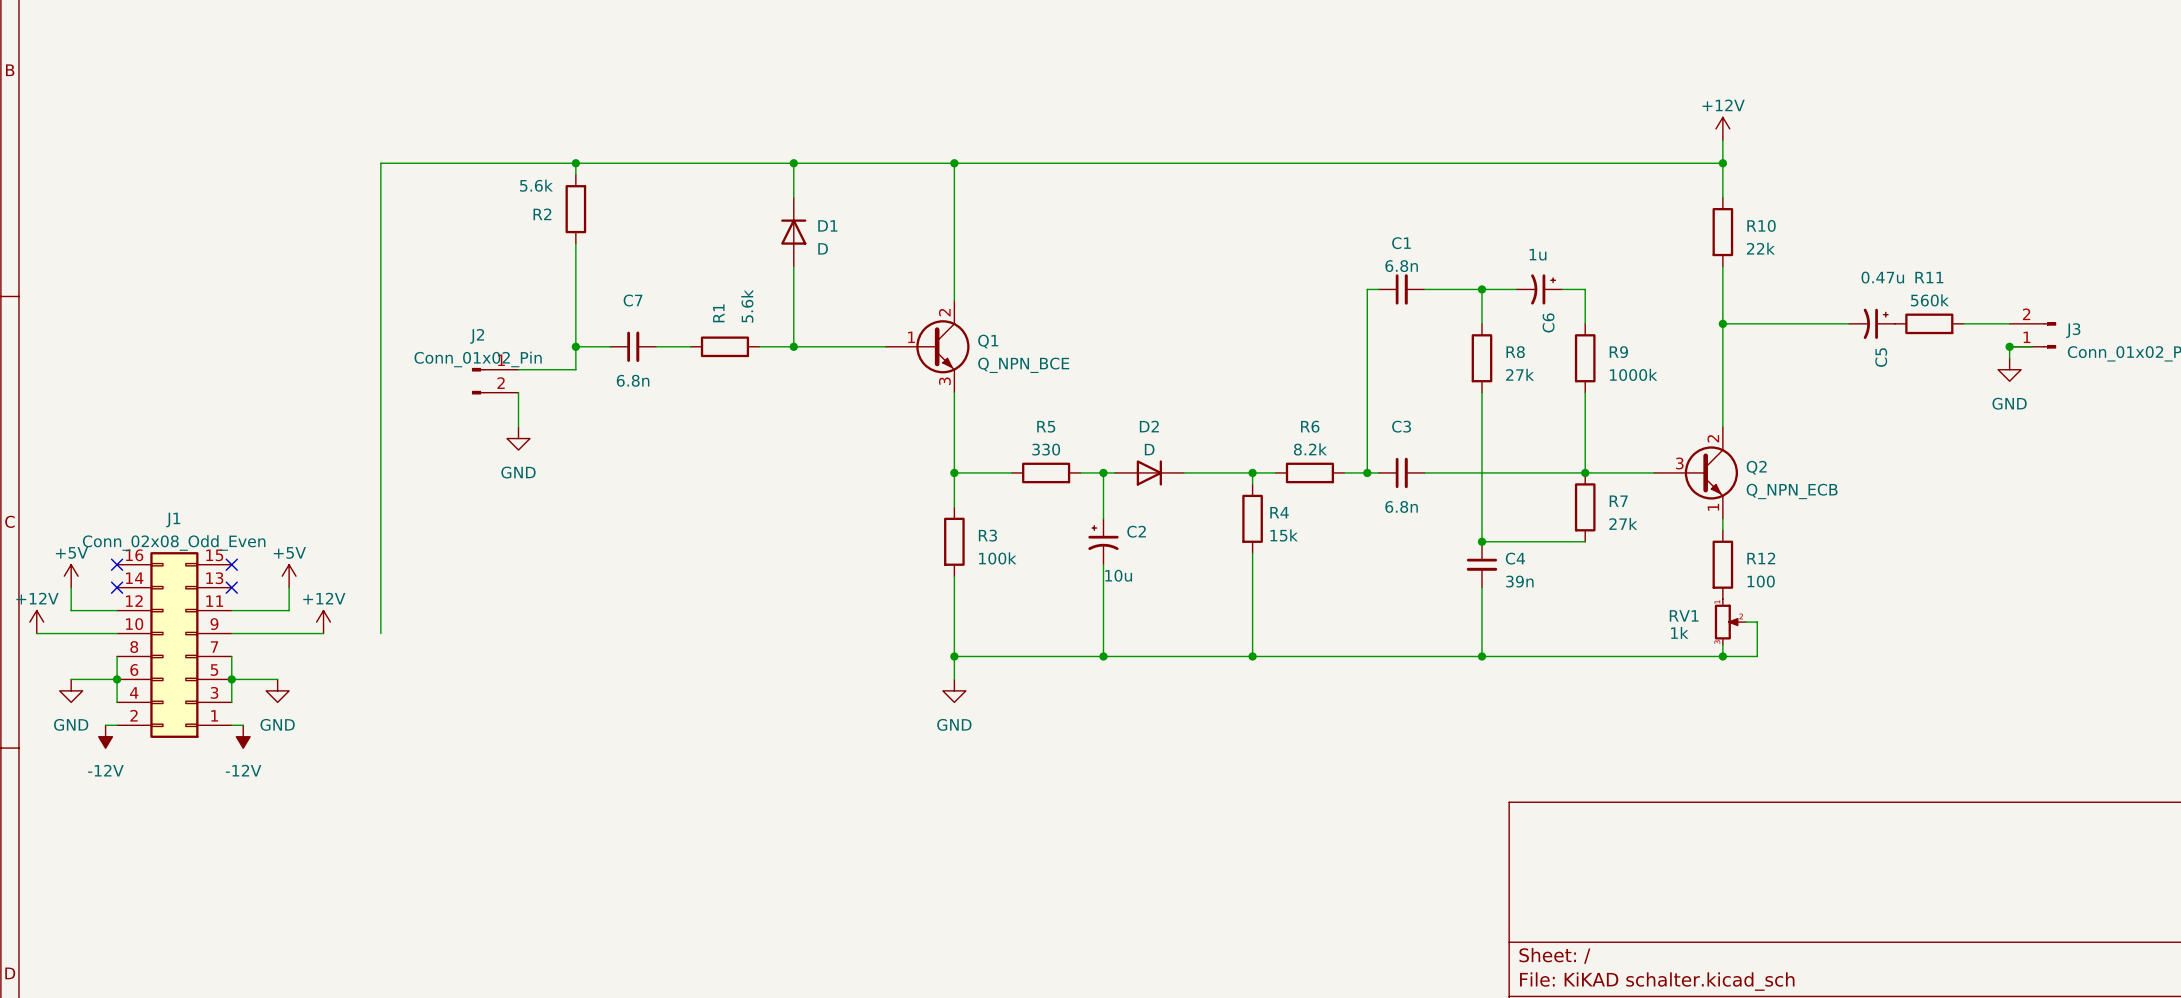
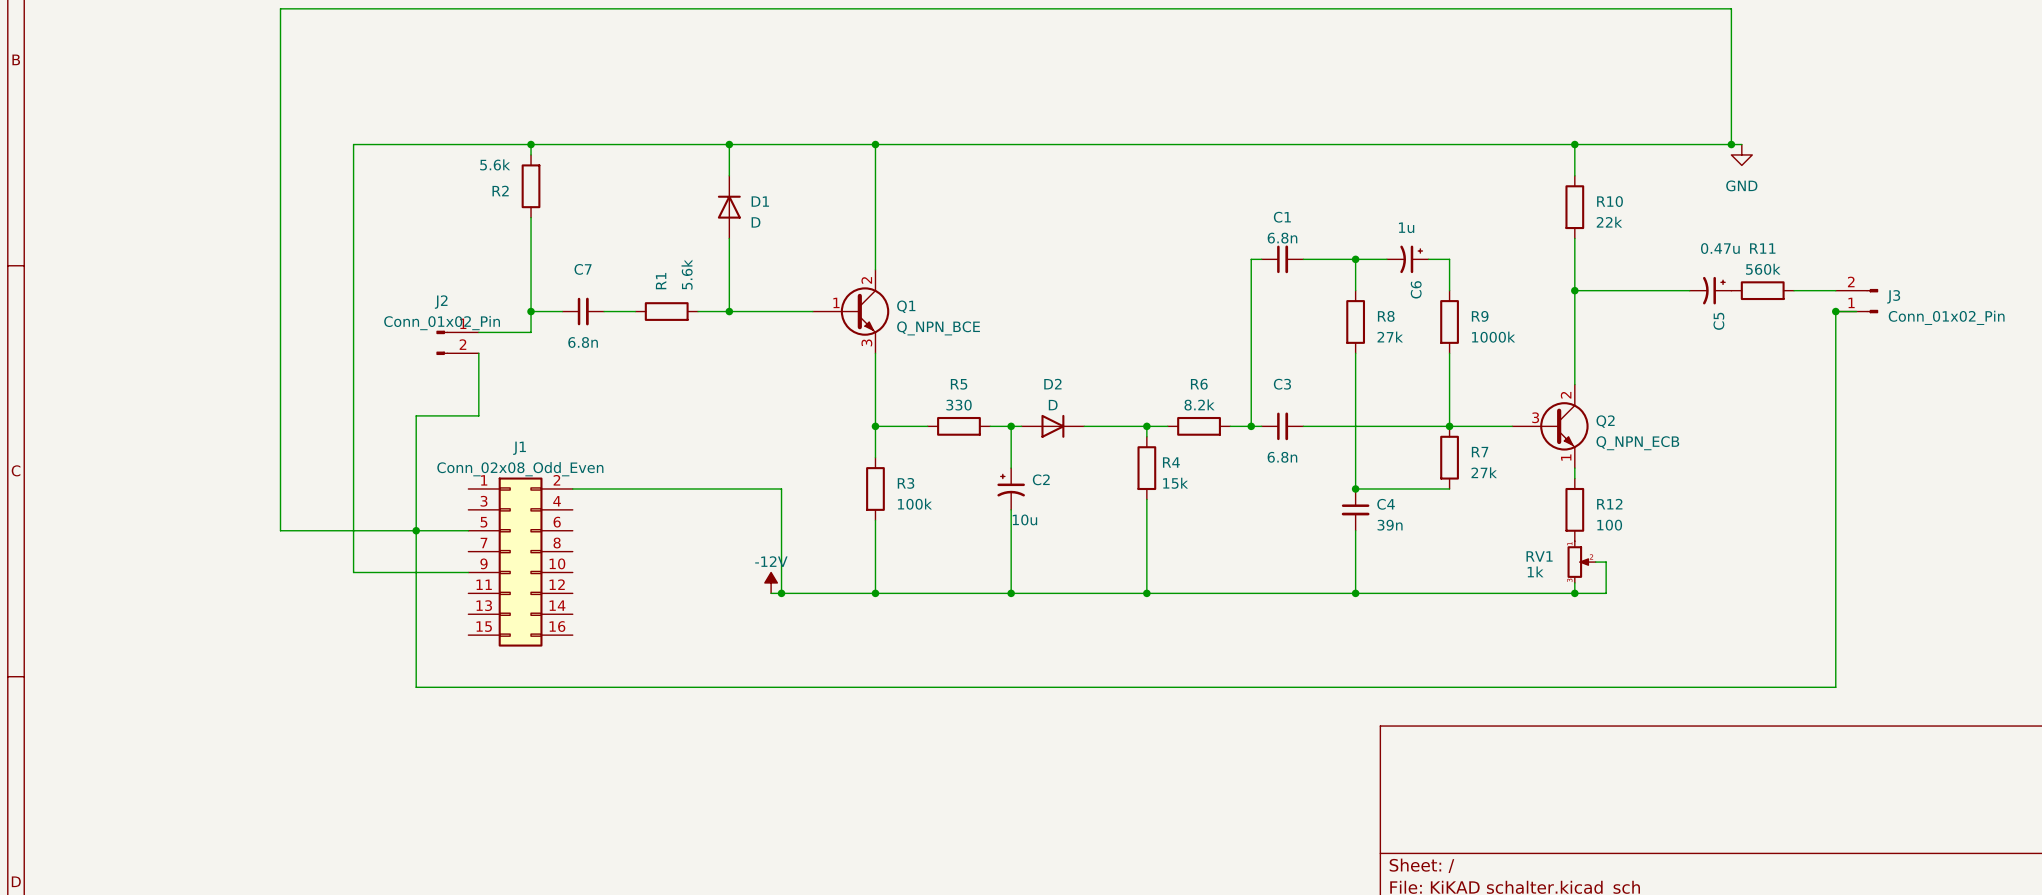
power symbol: +12V (1722, 128) -> none
wire: (1722, 140) (1722, 163) -> (1741, 144) (1574, 144)
wire: none -> (1731, 144) (1731, 8) (280, 8) (280, 530) (468, 530)
junction: none -> (1731, 144)
wire: none -> (1835, 321) (1835, 687) (416, 687) (416, 415) (478, 415) (478, 384)
power symbol position: GND (2009, 369) -> GND (1741, 154)
power symbol: GND (518, 438) -> none
wire: none -> (572, 488) (781, 488) (781, 593)
no-connect mark: (117, 564) -> none
no-connect mark: (231, 564) -> none
power symbol: +5V (71, 576) -> none
power symbol: +5V (289, 576) -> none
wire: (71, 587) (71, 610) (117, 610) -> none
no-connect mark: (117, 587) -> none
no-connect mark: (231, 587) -> none
wire: (289, 587) (289, 610) (231, 610) -> none
junction: none -> (416, 530)
power symbol: +12V (36, 622) -> none
power symbol: +12V (323, 622) -> none
wire: (36, 633) (117, 633) -> none
wire: (231, 633) (323, 633) -> none
wire: none -> (353, 572) (468, 572)
J1 rotation: 0° (174, 645) -> 180° (520, 562)
J1 position: (174, 645) -> (520, 562)
power symbol: none -> -12V (771, 582)
wire: (117, 656) (117, 702) -> none
wire: (231, 656) (231, 702) -> none
junction: none -> (781, 593)
wire: (954, 656) (954, 679) -> (875, 593) (771, 593)
wire: (71, 679) (117, 679) -> none
junction: (117, 679) -> none
wire: (231, 679) (277, 679) -> none
junction: (231, 679) -> none
power symbol: GND (71, 690) -> none
power symbol: GND (277, 690) -> none
power symbol: GND (954, 690) -> none
wire: (105, 725) (117, 725) -> none
wire: (231, 725) (243, 725) -> none
power symbol: -12V (105, 736) -> none
power symbol: -12V (243, 736) -> none

